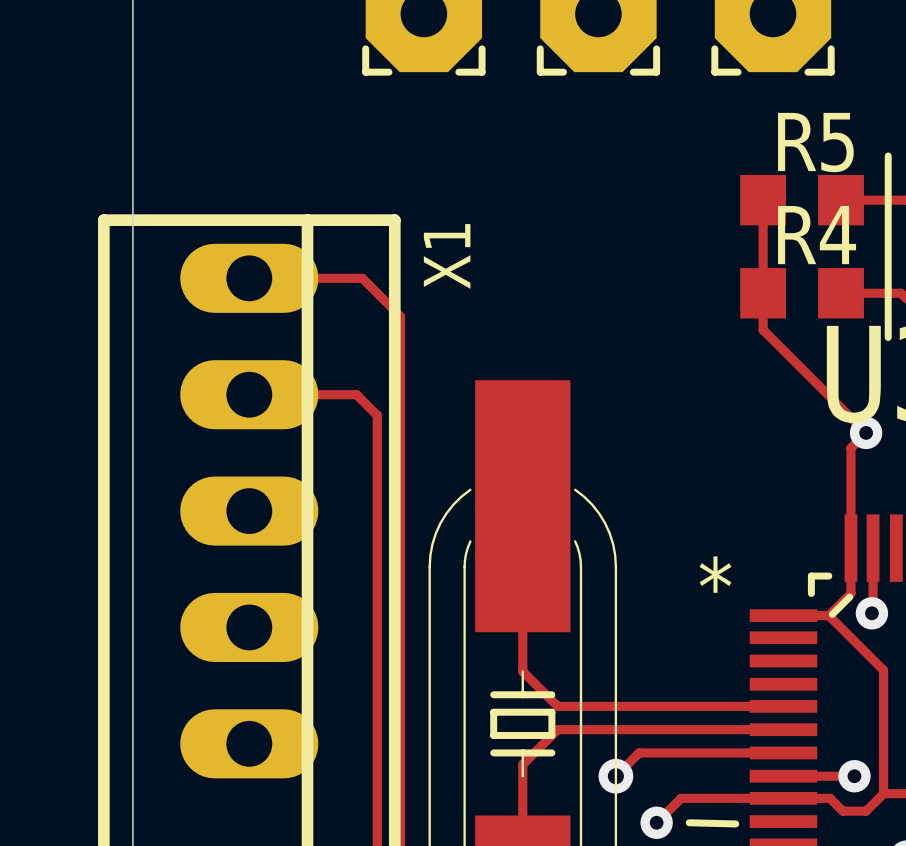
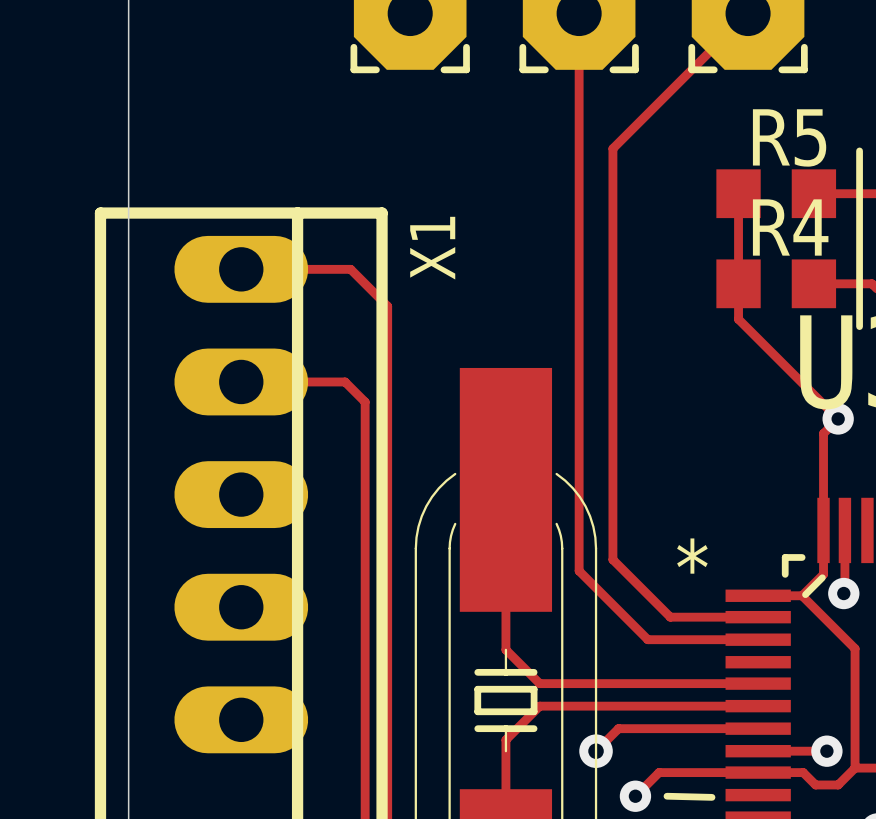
track: none -> (579, 13) (579, 570) (647, 639) (758, 639)
track: none -> (748, 13) (612, 148) (612, 559) (670, 617) (758, 617)

